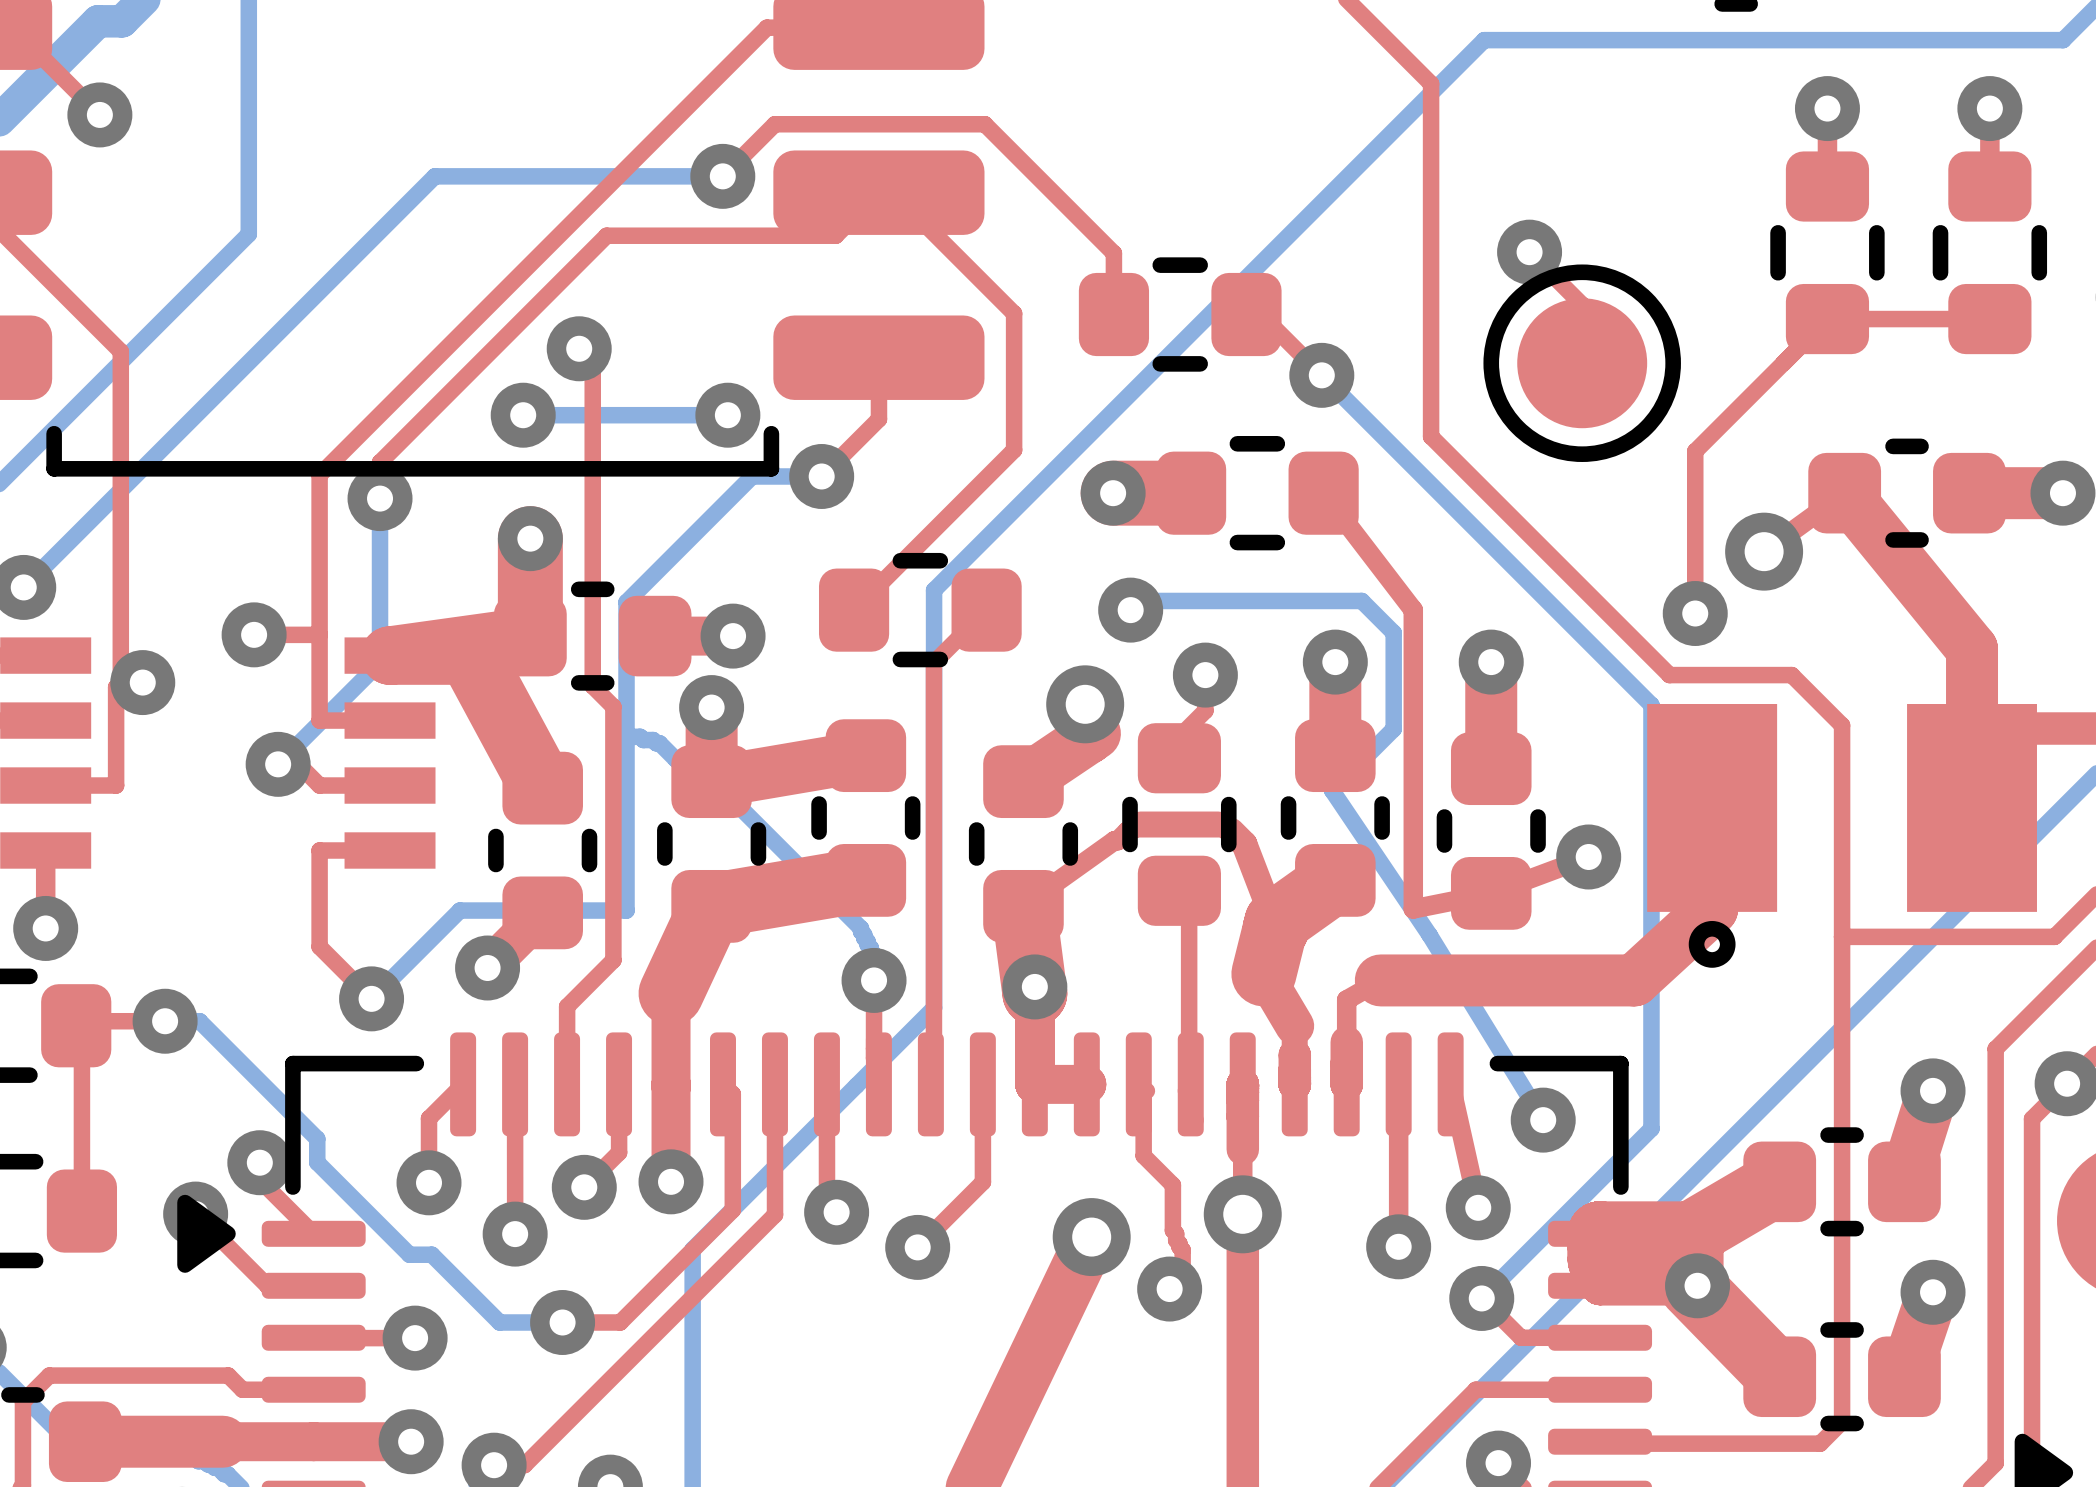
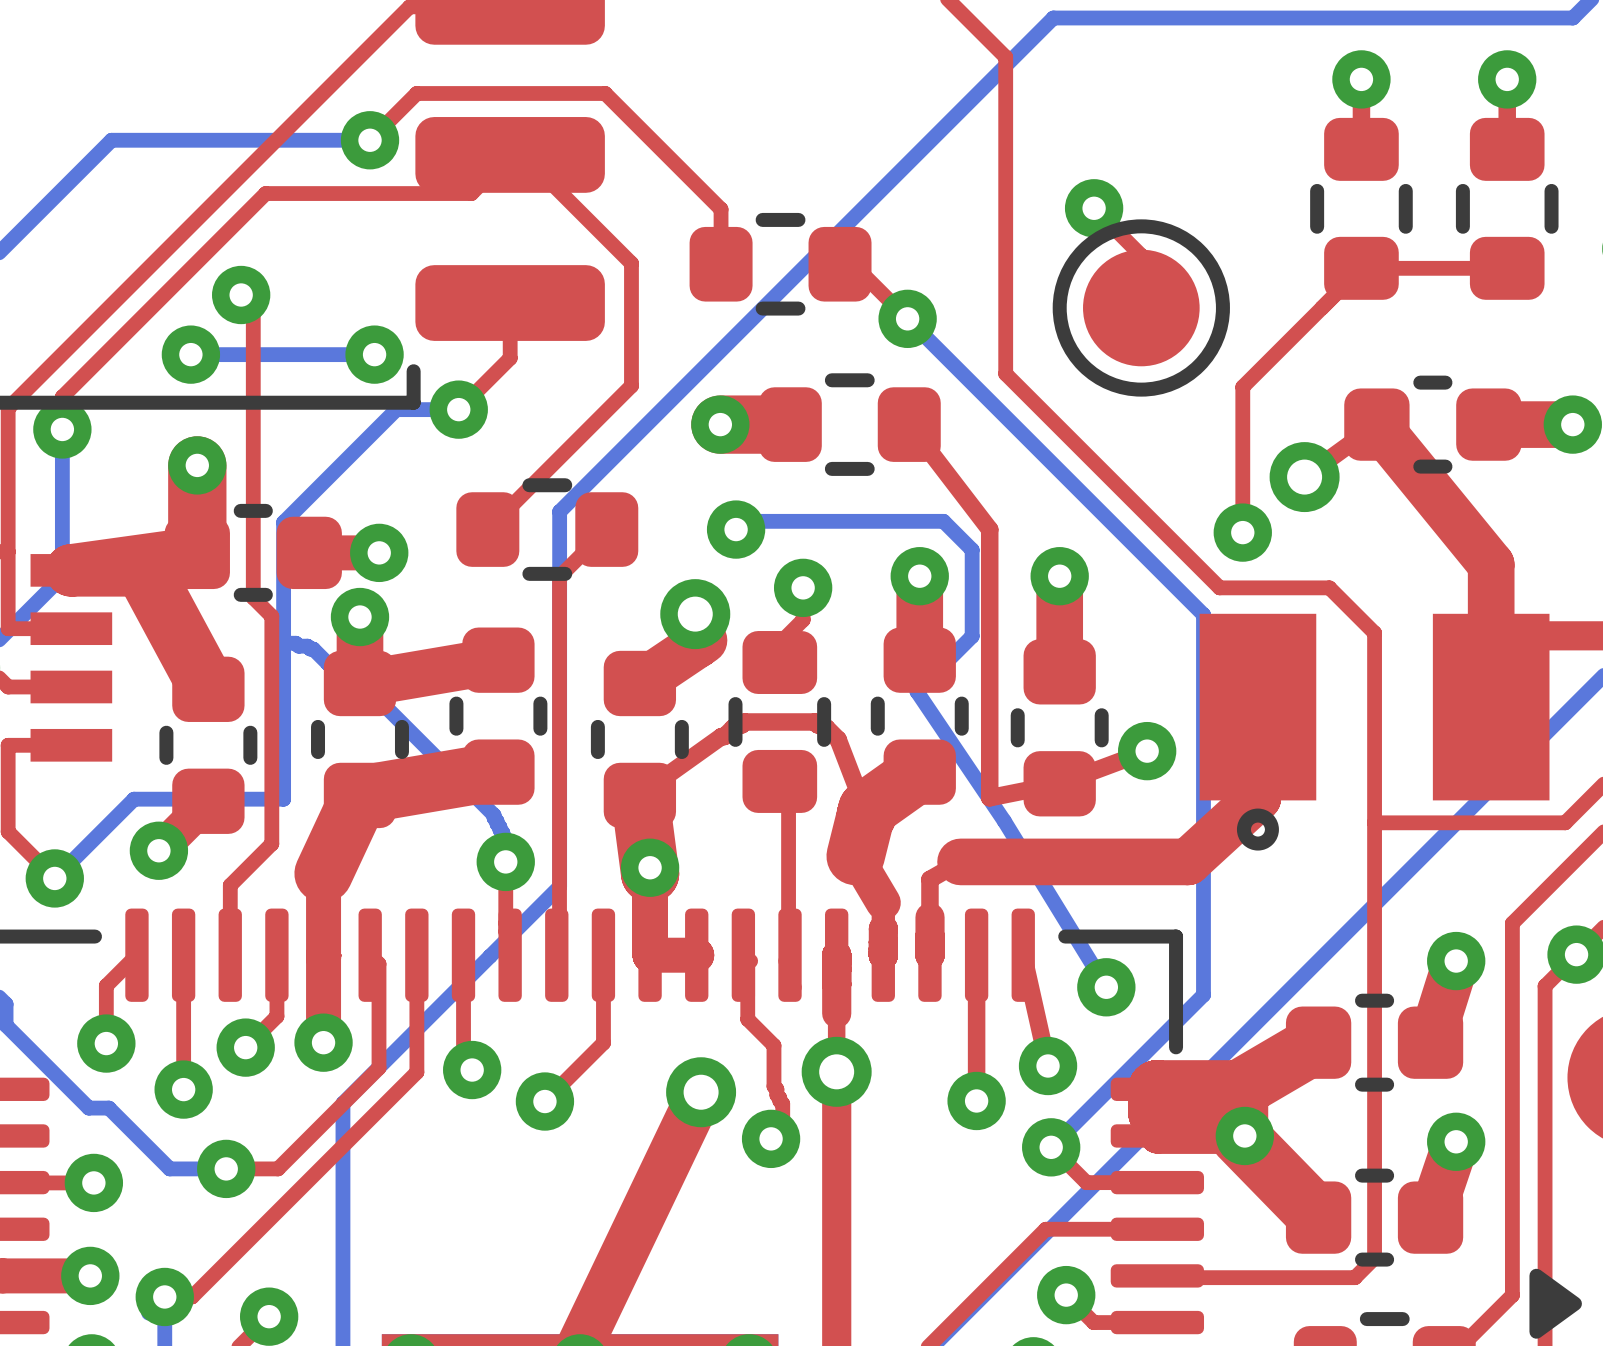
top track width: thick (1140, 824) (1218, 824) -> thin (744, 721) (814, 721)
top track width: thick (1231, 831) (1244, 844) (1275, 925) -> thin (826, 727) (838, 739) (866, 813)

